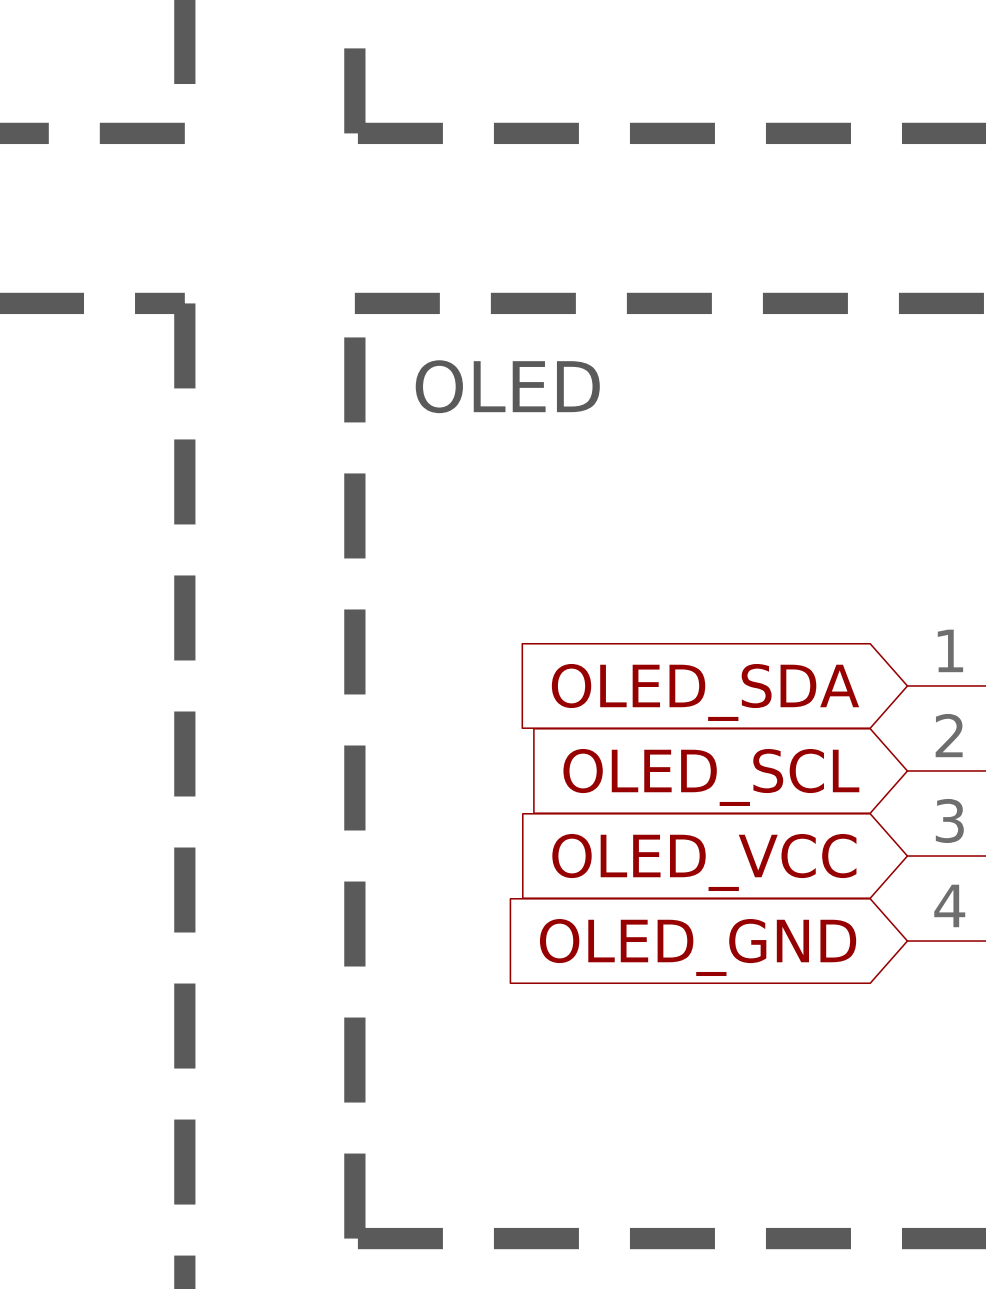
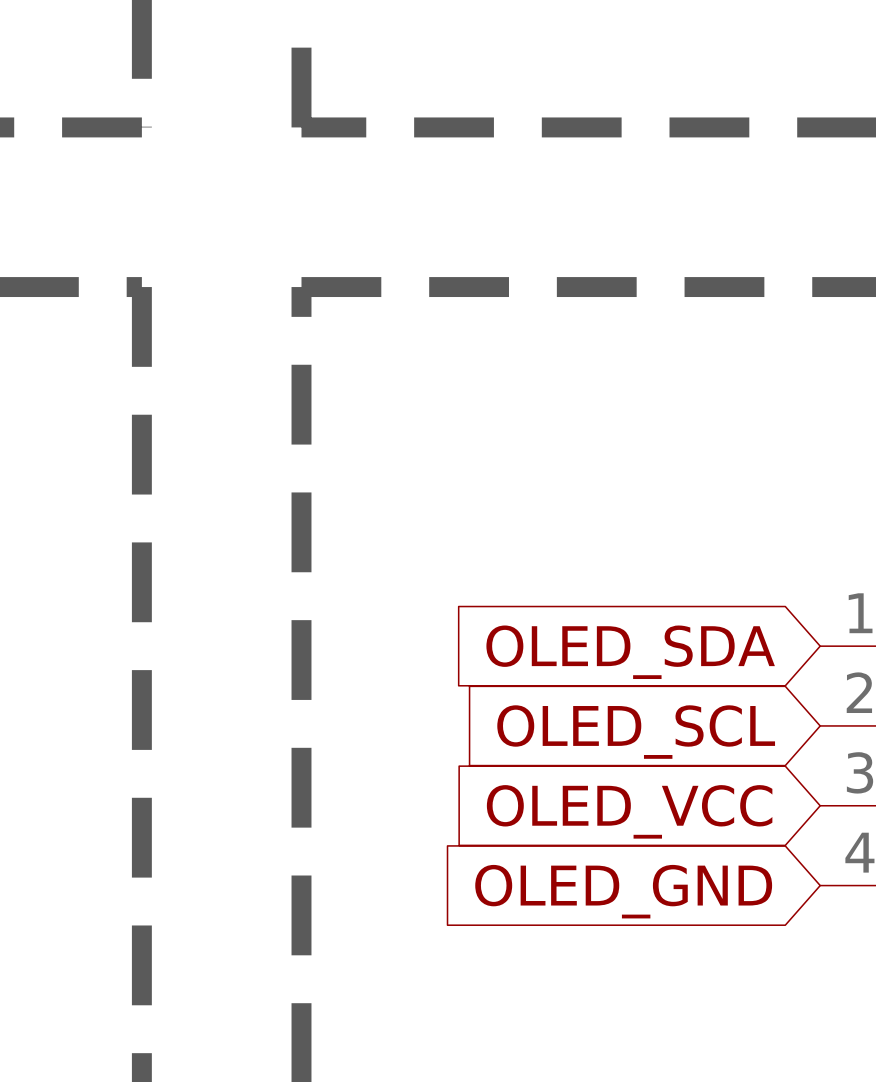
text: OLED (507, 386) -> none

